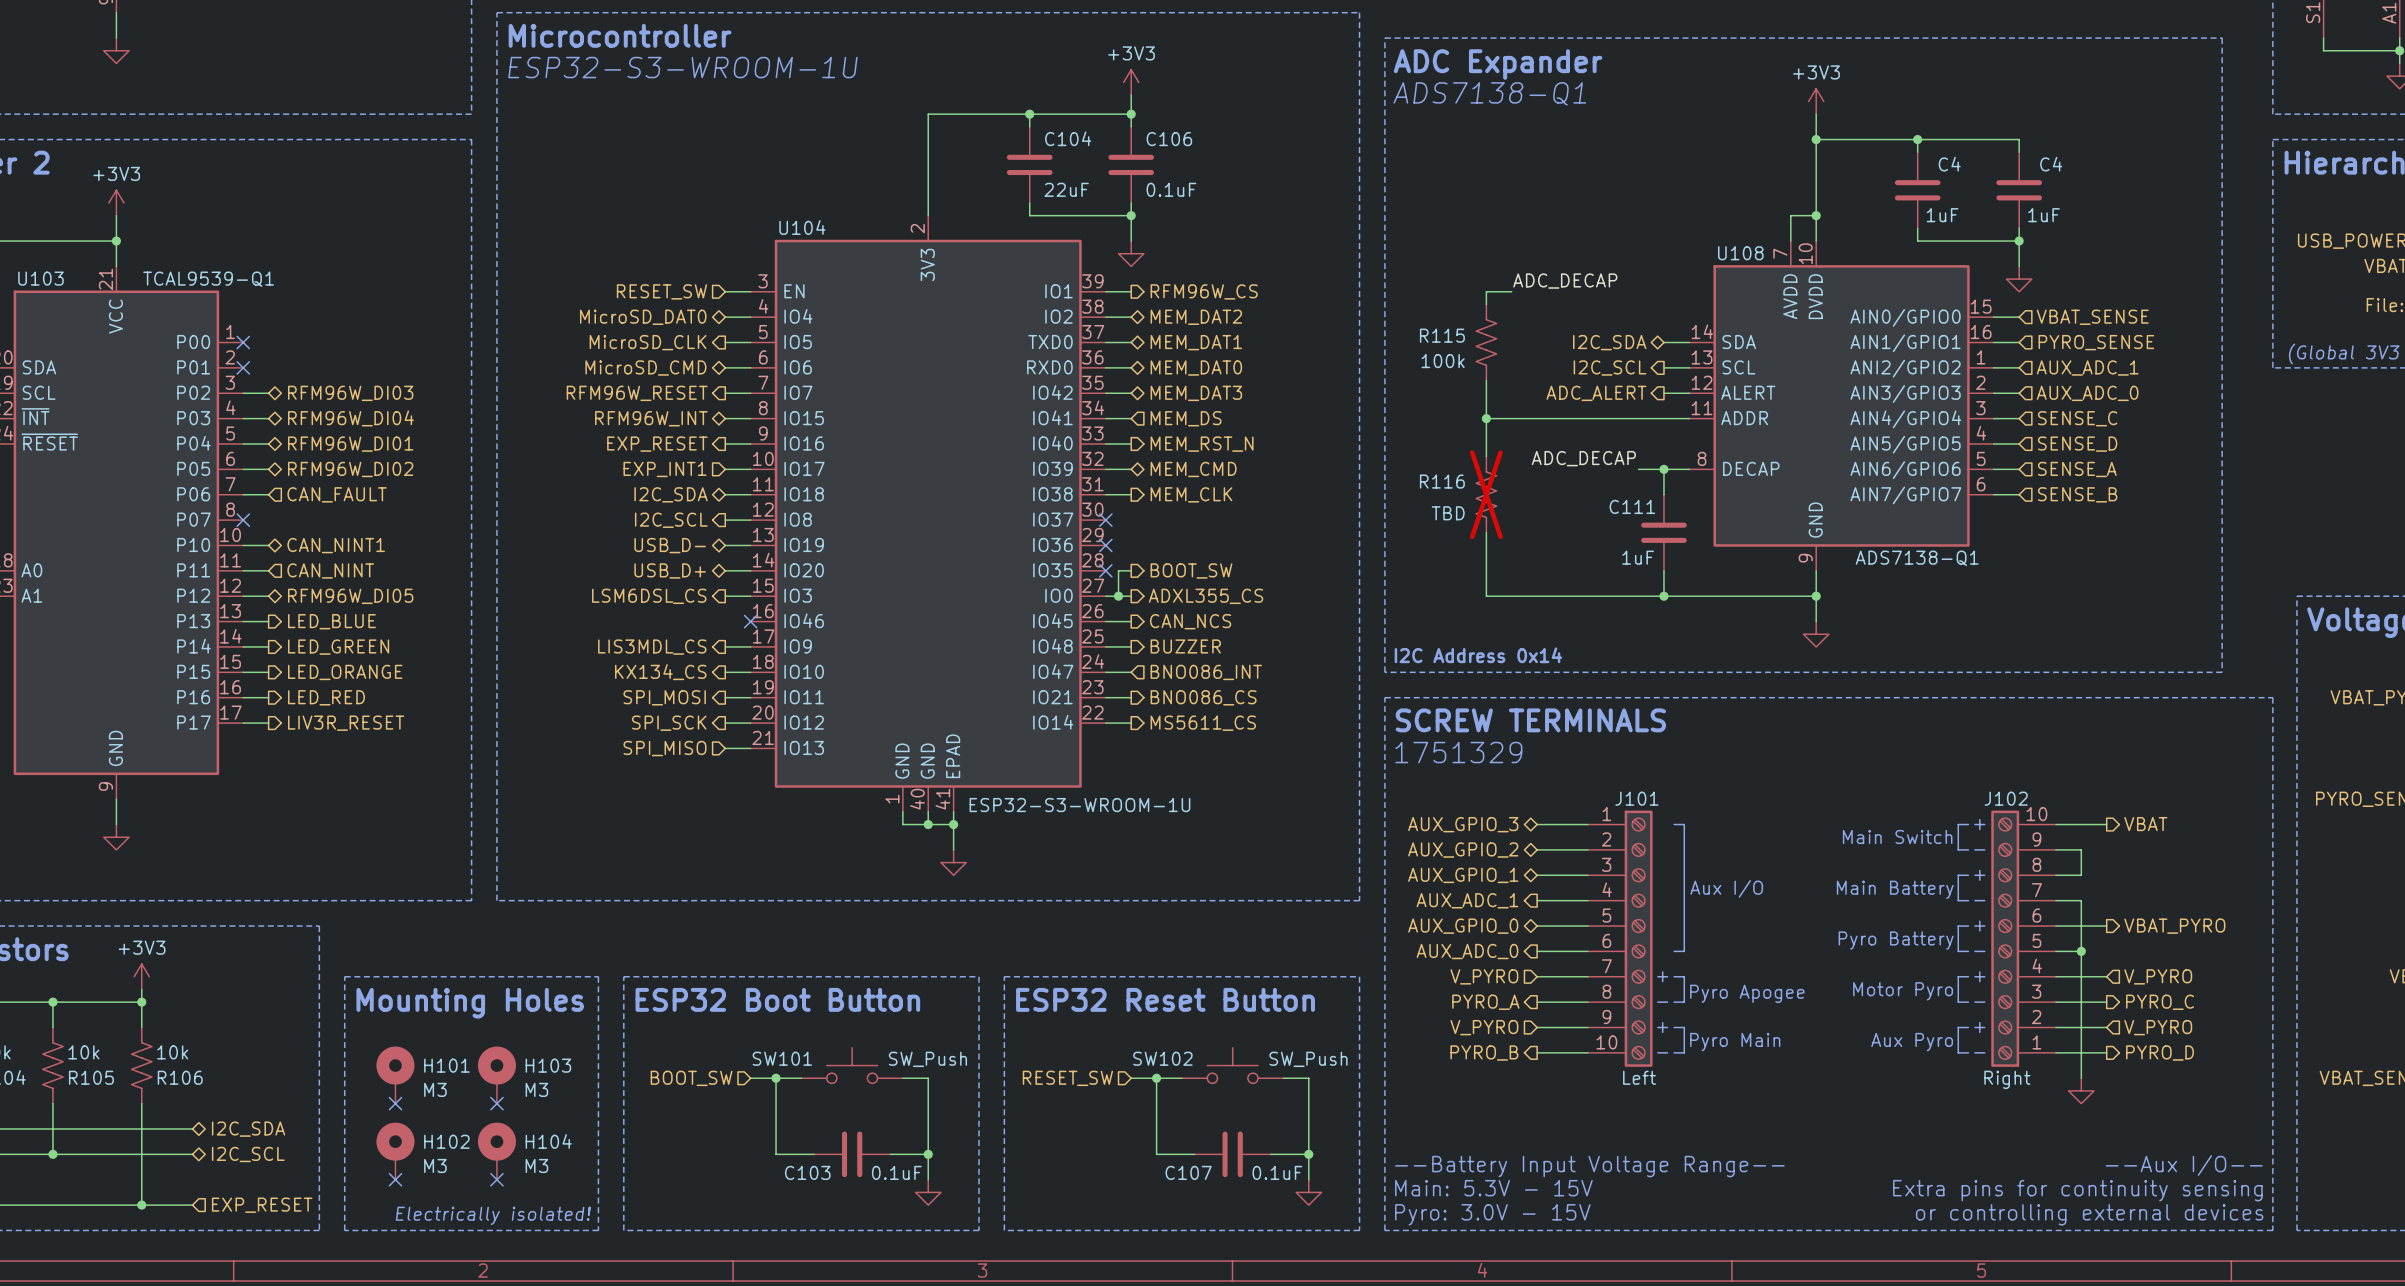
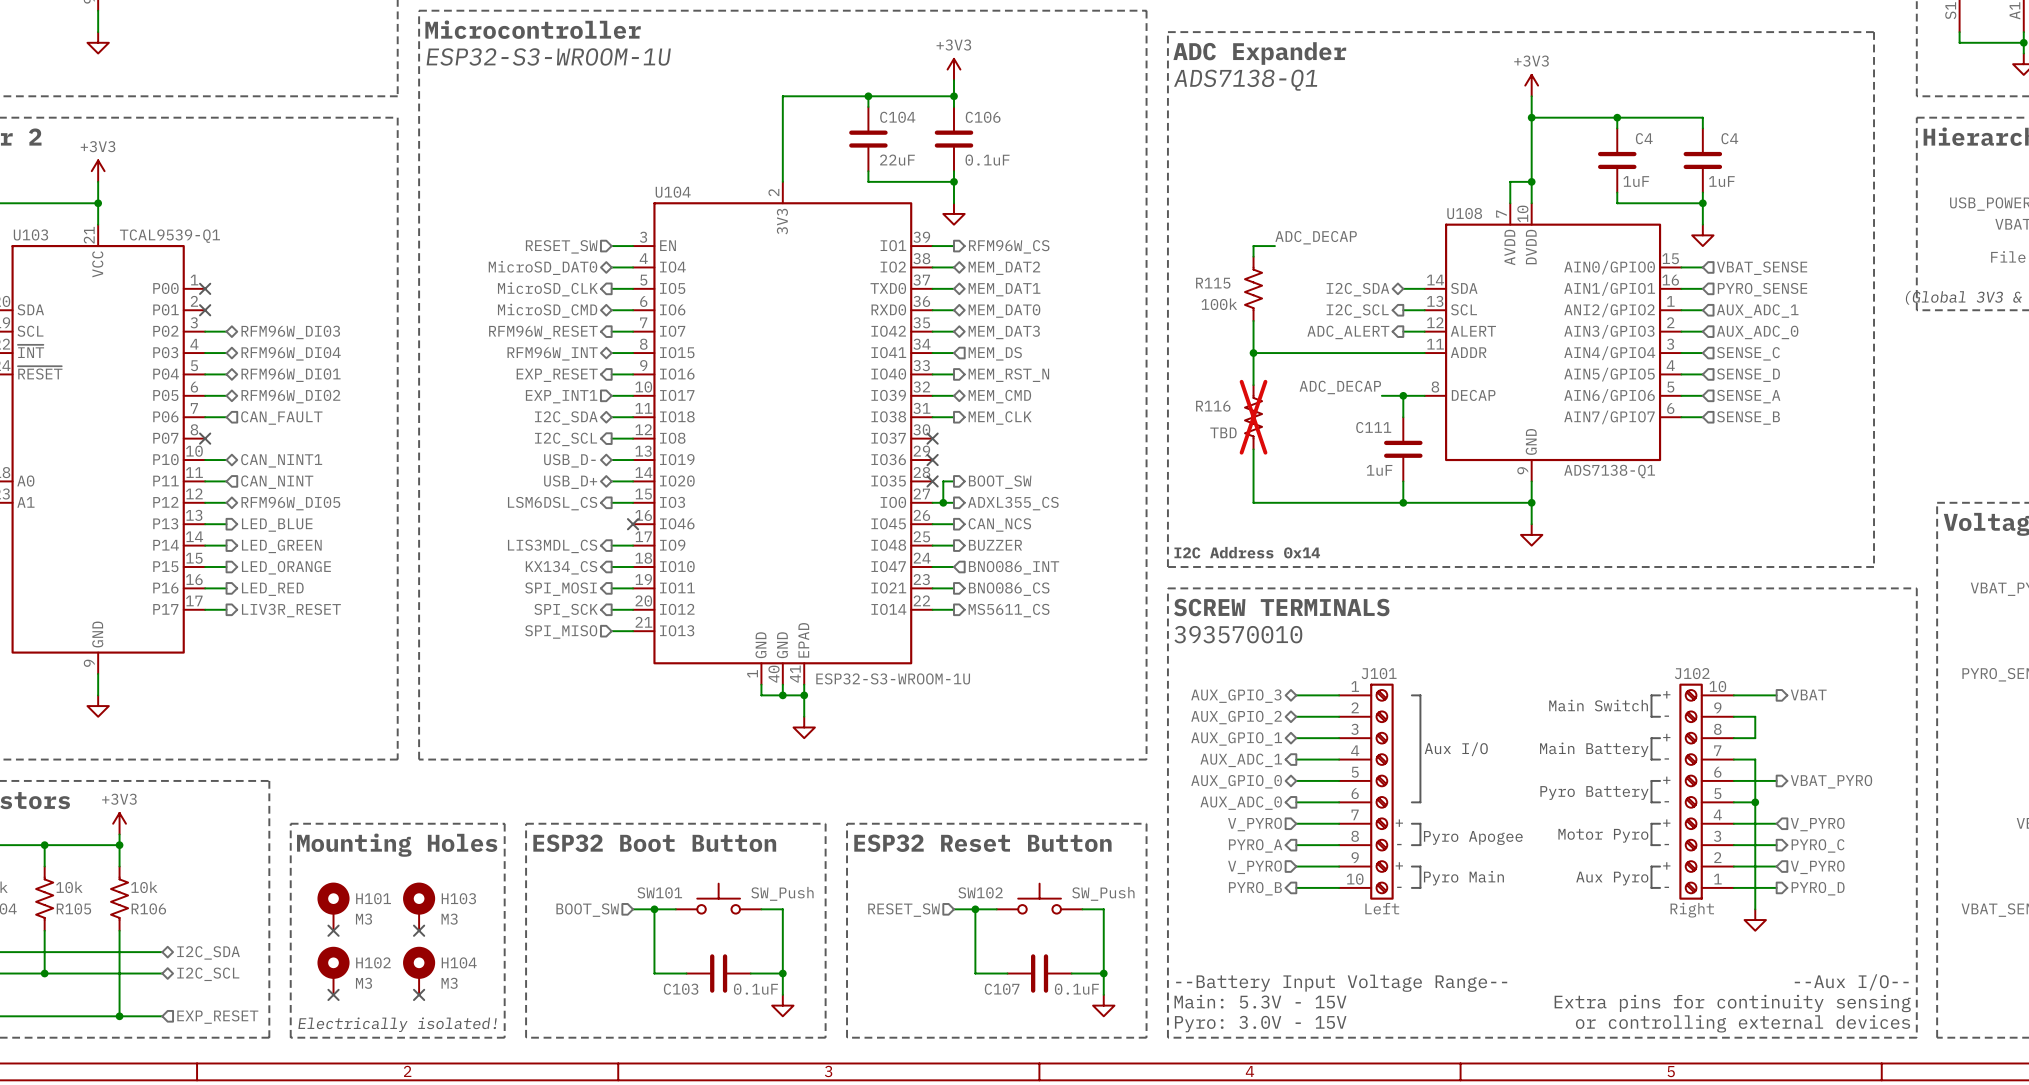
text: 1751329 (1458, 752) -> 393570010 (1238, 634)

